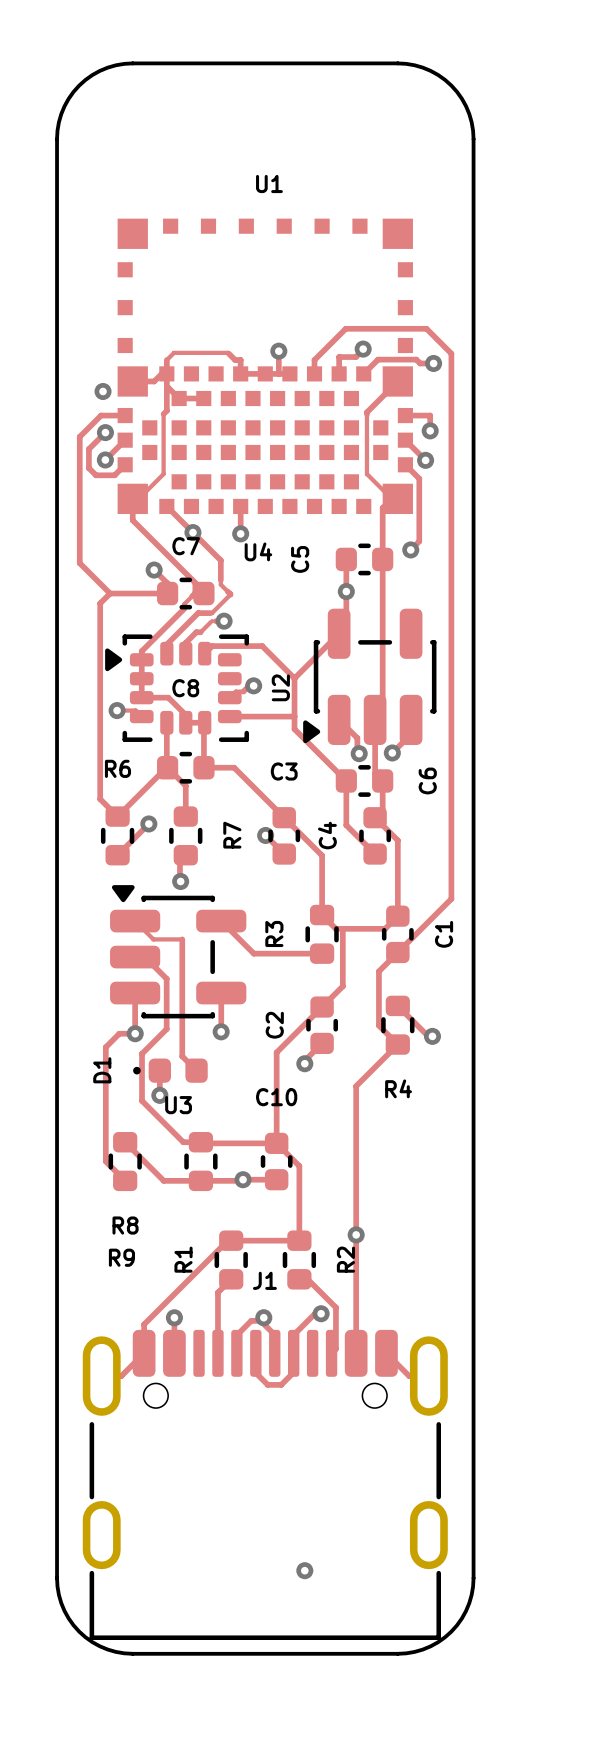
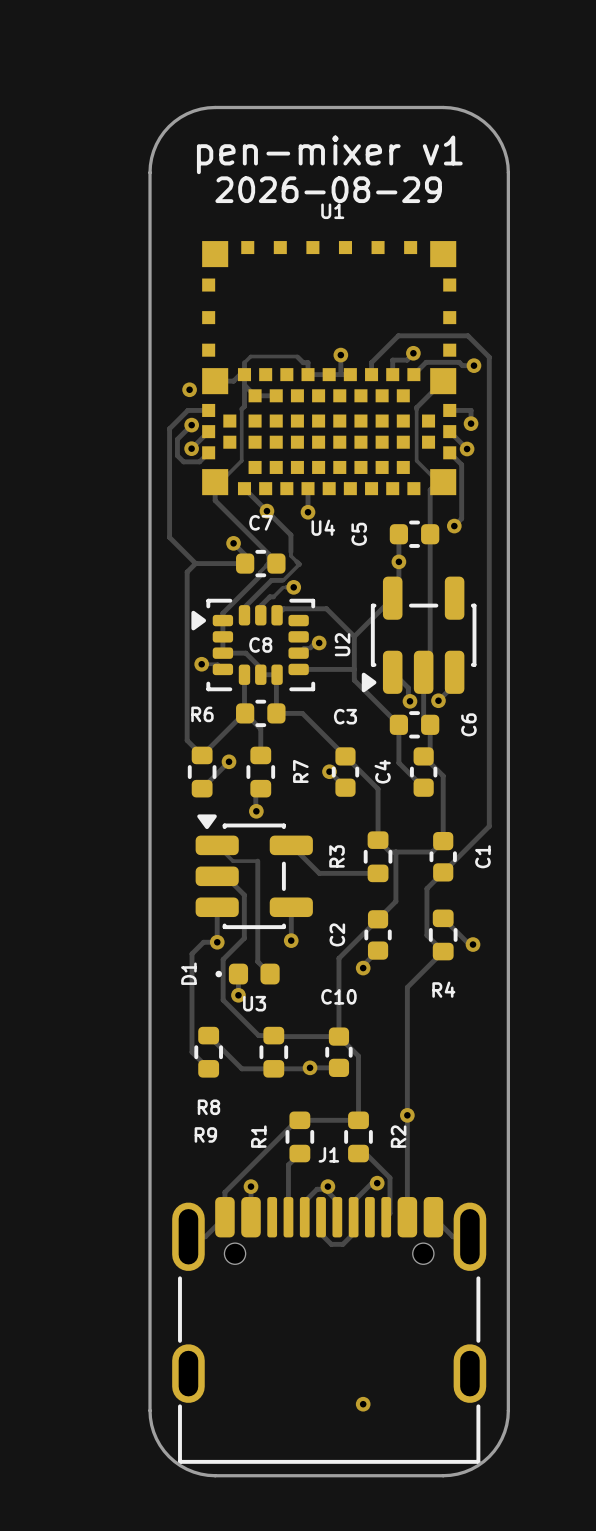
text: none -> pen-mixer v1 (329, 154)
text: none -> 2026-08-29 (328, 189)

